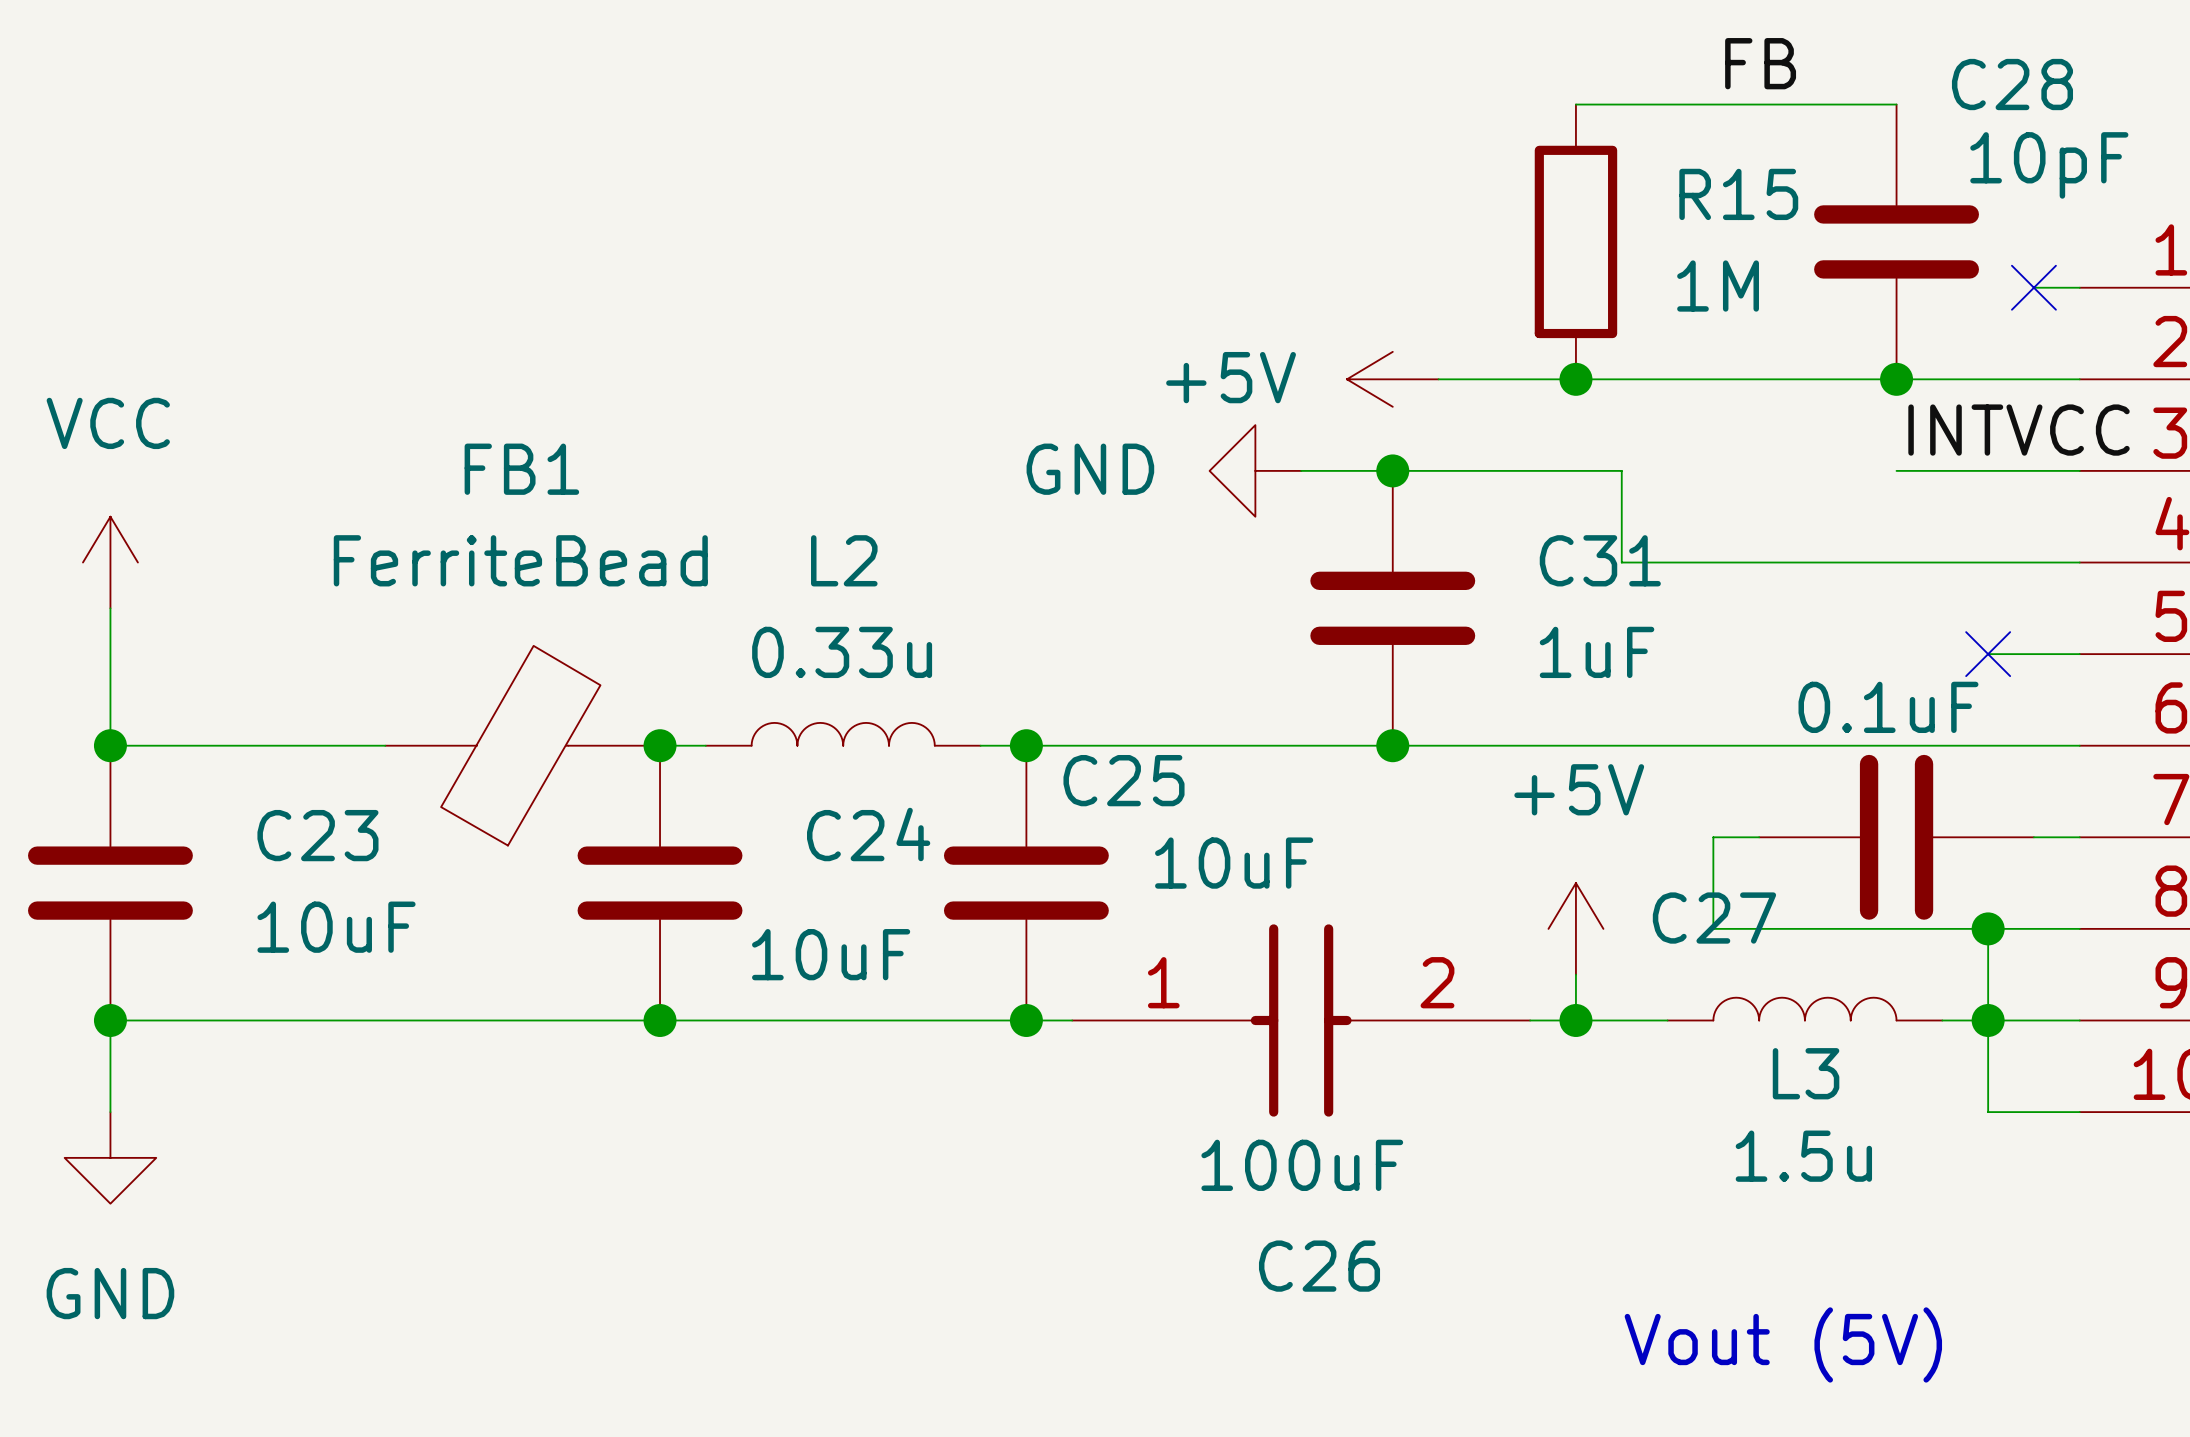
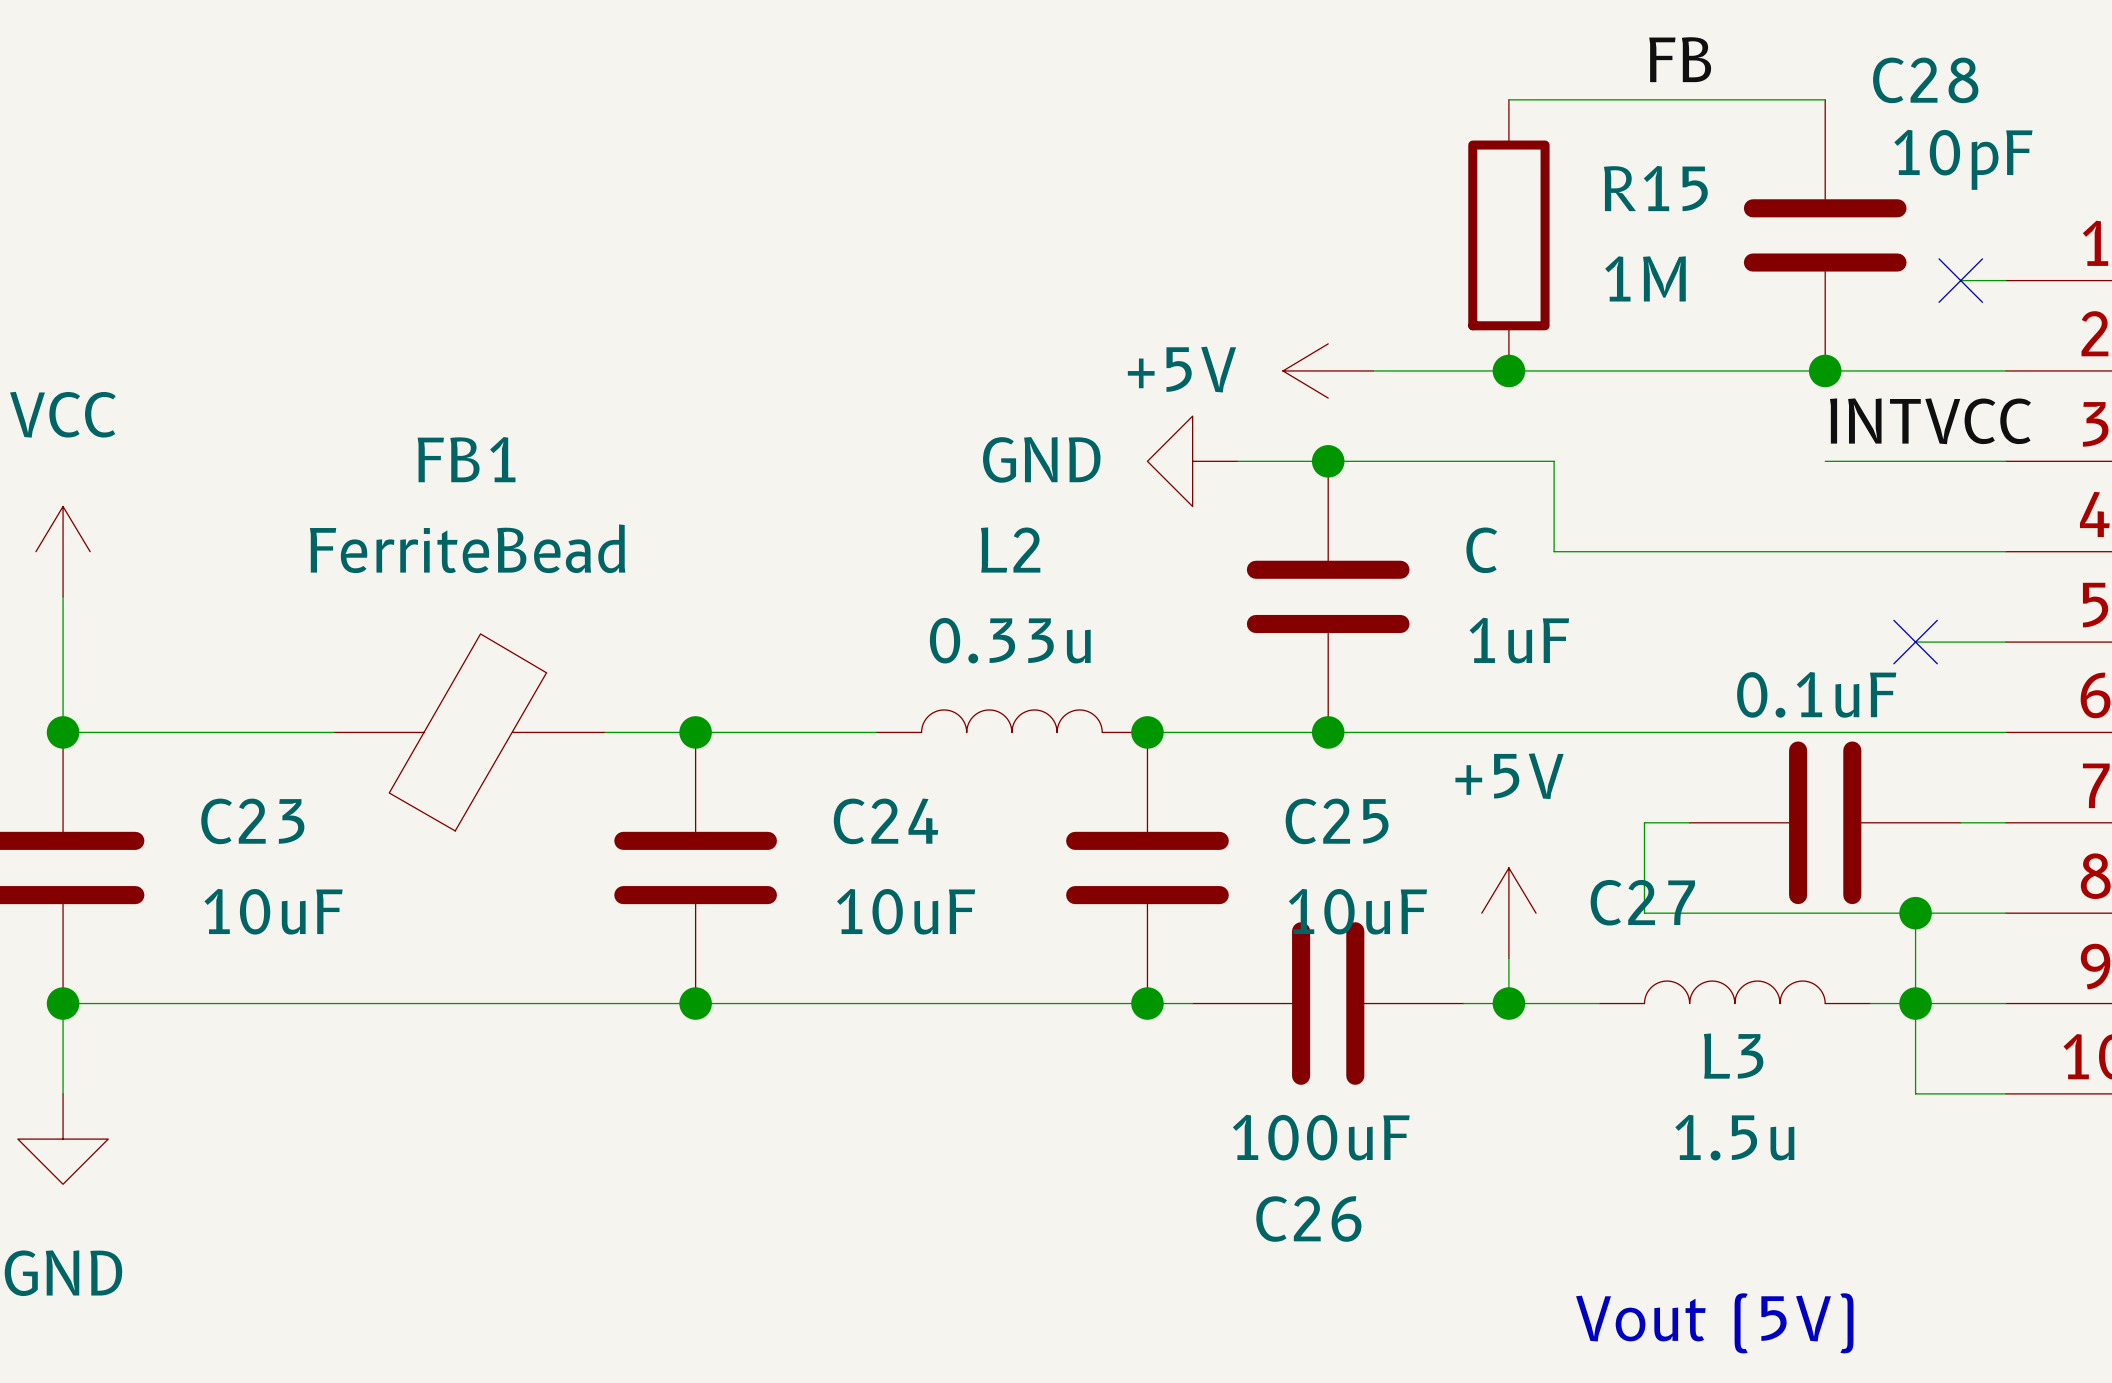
C31 name: C31 (1600, 560) -> C (1481, 550)
L2 position: (843, 734) -> (1011, 721)
junction position: (660, 745) -> (695, 732)
wire: (980, 745) (1209, 745) -> (650, 732) (876, 732)
junction: (1026, 745) -> none
junction: none -> (1147, 732)
C25 name position: C25 (1124, 780) -> C25 (1337, 821)
C25 value position: 10uF (1234, 863) -> 10uF (1357, 911)
C24 position: (660, 883) -> (695, 867)
C25 position: (1026, 883) -> (1147, 867)
C26 symbol: [1072, 924, 1531, 1117] -> [1192, 922, 1464, 1085]
C24 value position: 10uF (831, 954) -> 10uF (906, 911)
junction position: (660, 1020) -> (695, 1003)
junction: (1026, 1020) -> none
junction: none -> (1147, 1003)

